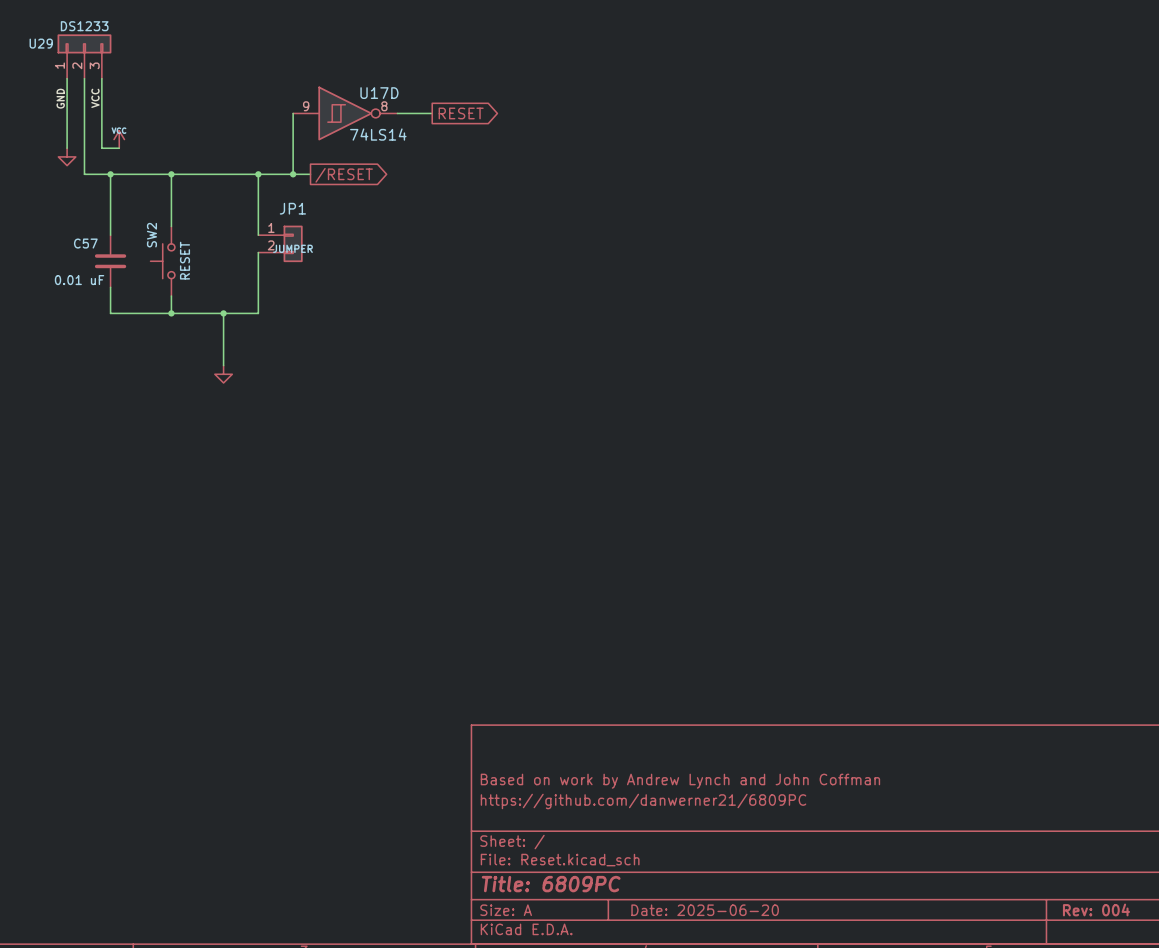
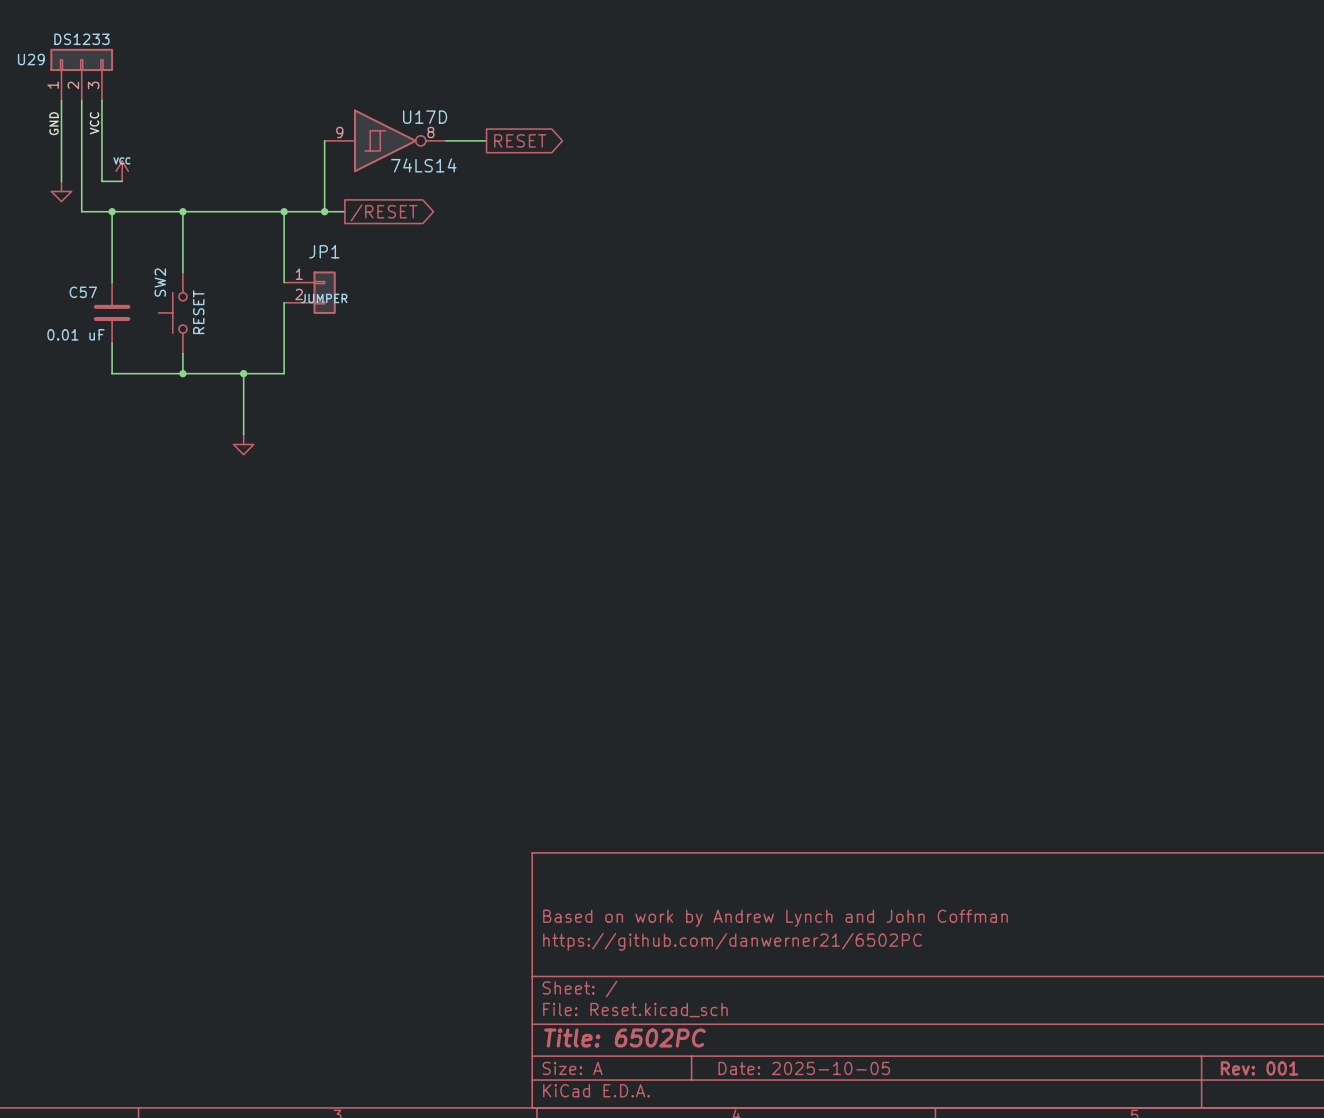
title block: https://github.com/danwerner21/6809PC (643, 801) -> https://github.com/danwerner21/6502PC (732, 941)
title block: Title: 6809PC (551, 884) -> Title: 6502PC (625, 1038)
title block: Rev: 004 (1096, 909) -> Rev: 001 (1259, 1068)
title block: Date: 2025-06-20 (705, 910) -> Date: 2025-10-05 (804, 1068)

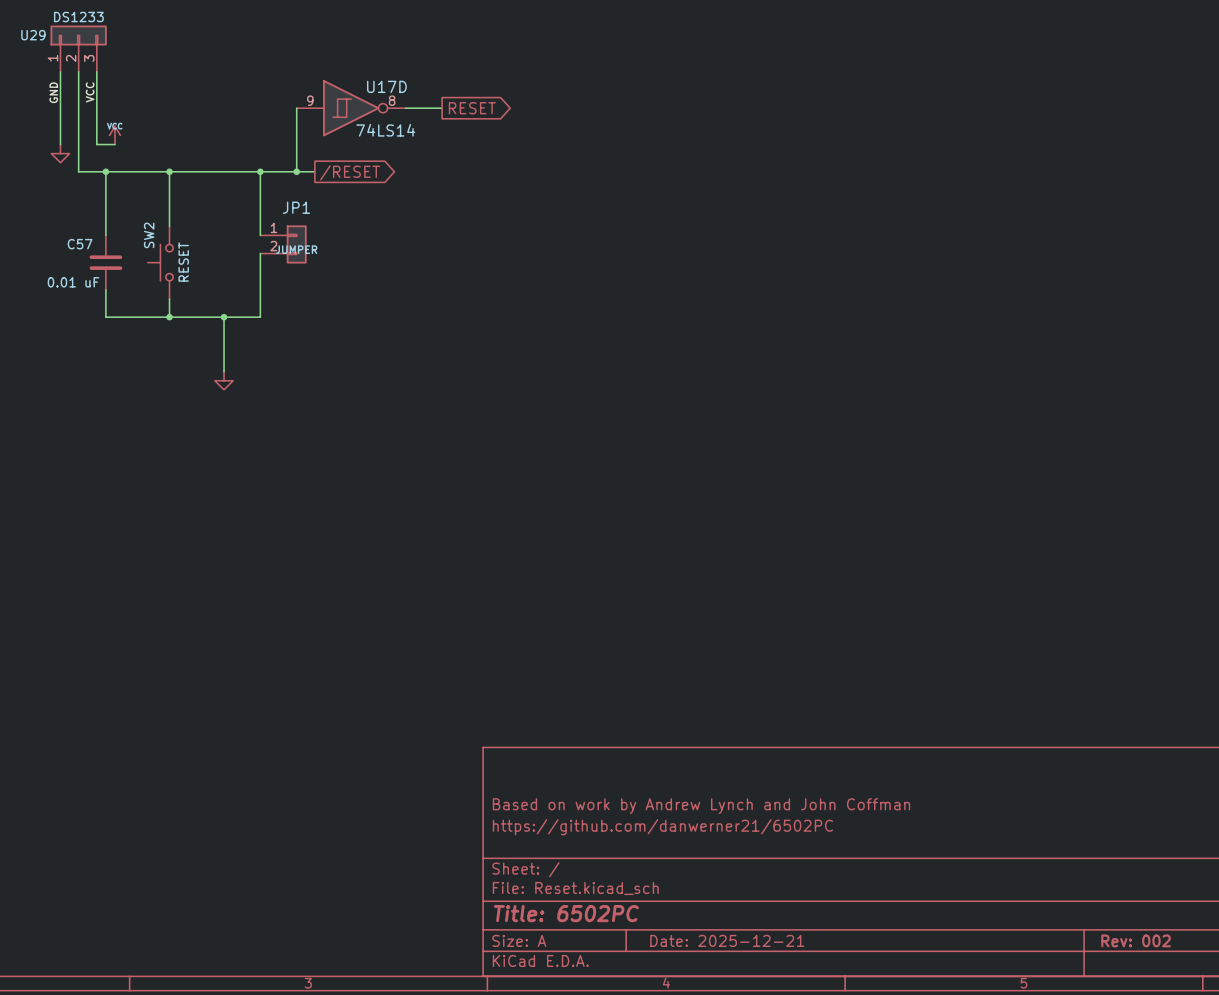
title block: Date: 2025-10-05 (804, 1068) -> Date: 2025-12-21 (727, 940)
title block: Rev: 001 (1259, 1068) -> Rev: 002 (1136, 940)

